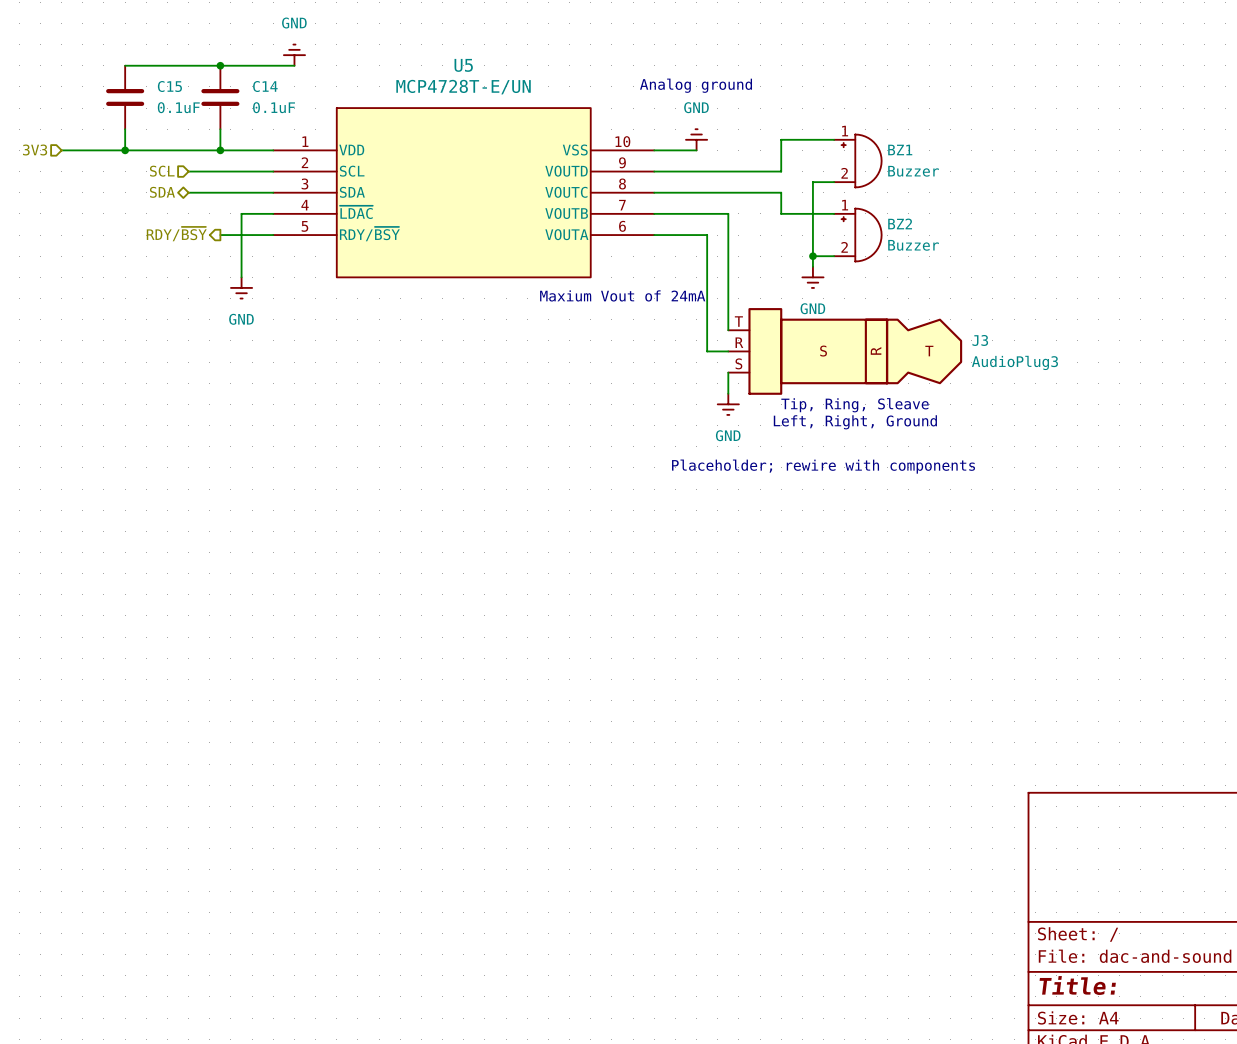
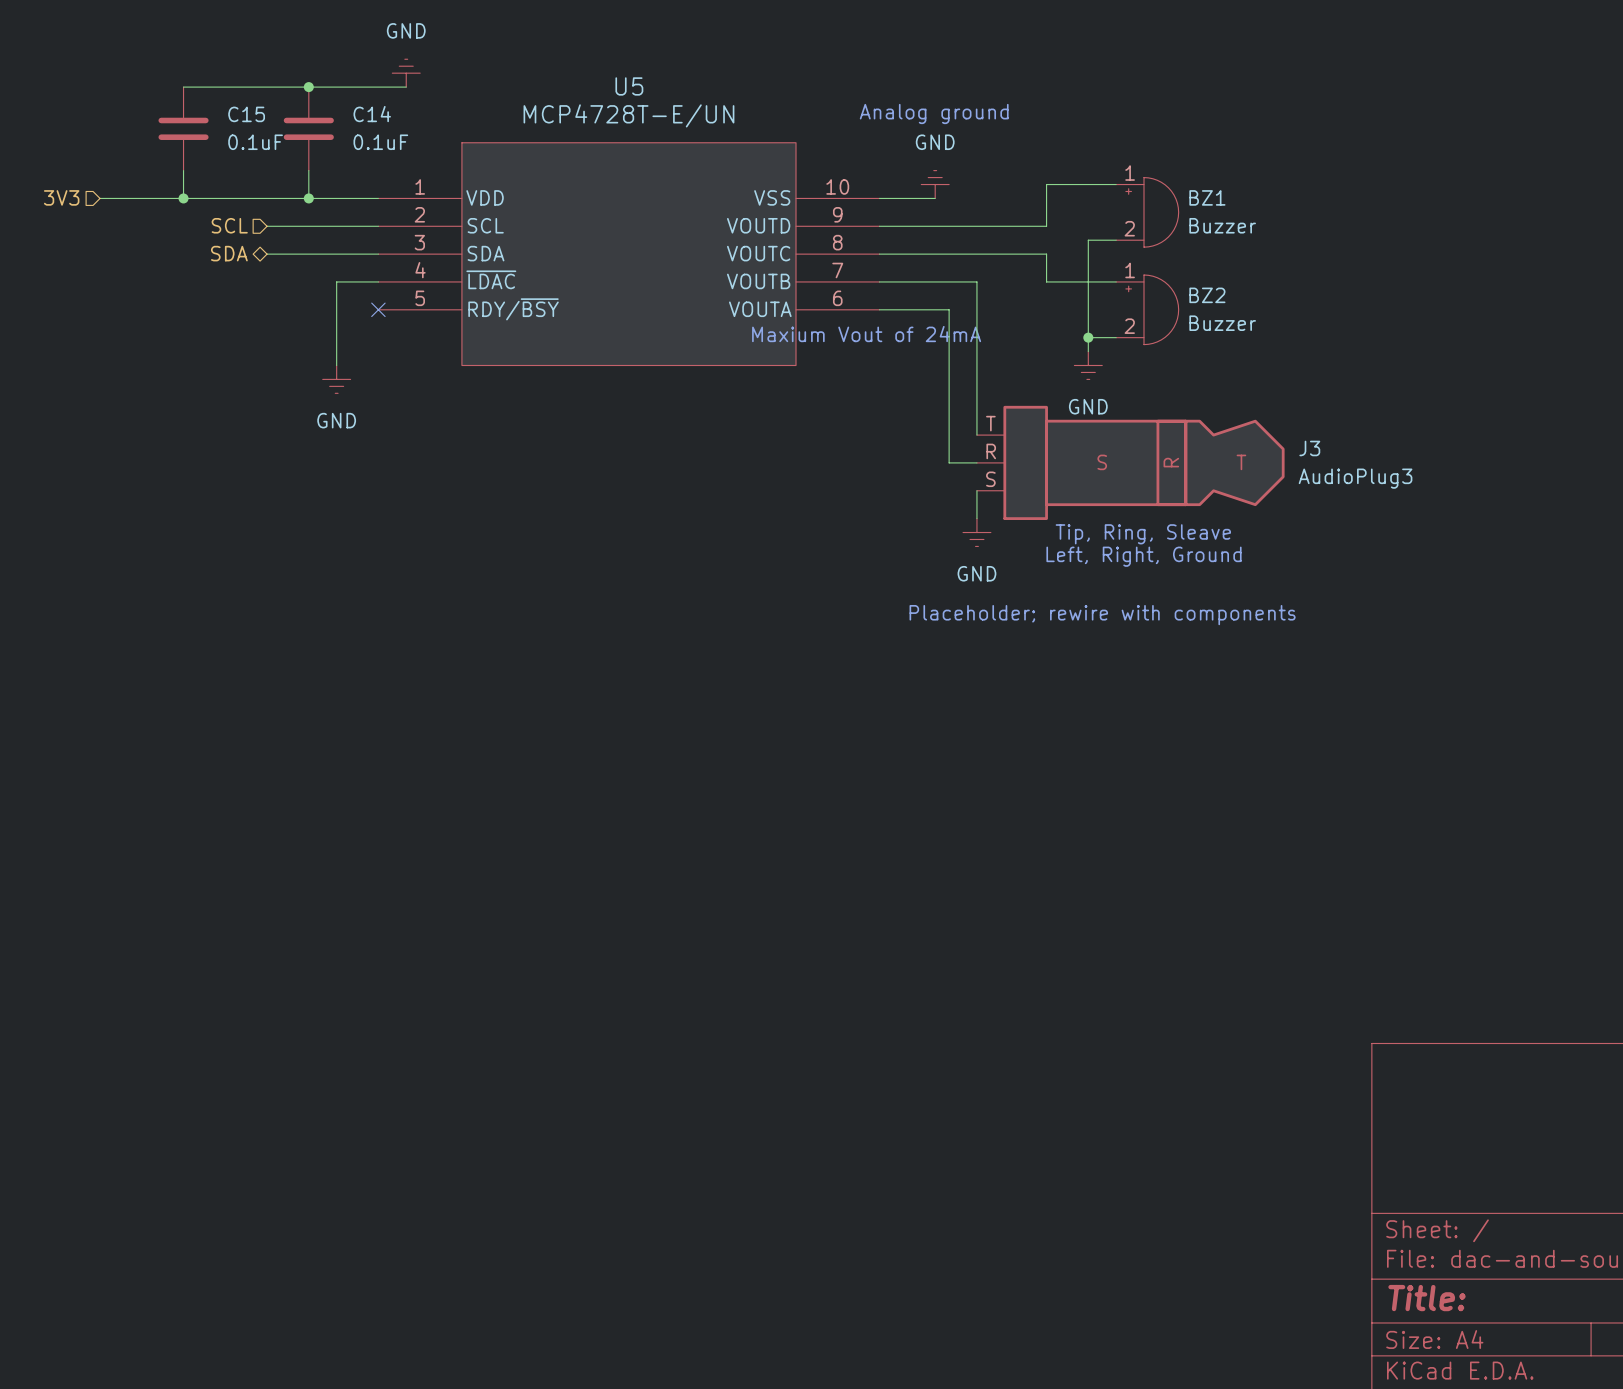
hierarchical label: RDY/~{BSY} (176, 234) -> none
wire: (220, 235) (273, 235) -> none
no-connect mark: none -> (378, 309)
text position: Maxium Vout of 24mA (622, 295) -> Maxium Vout of 24mA (866, 334)

